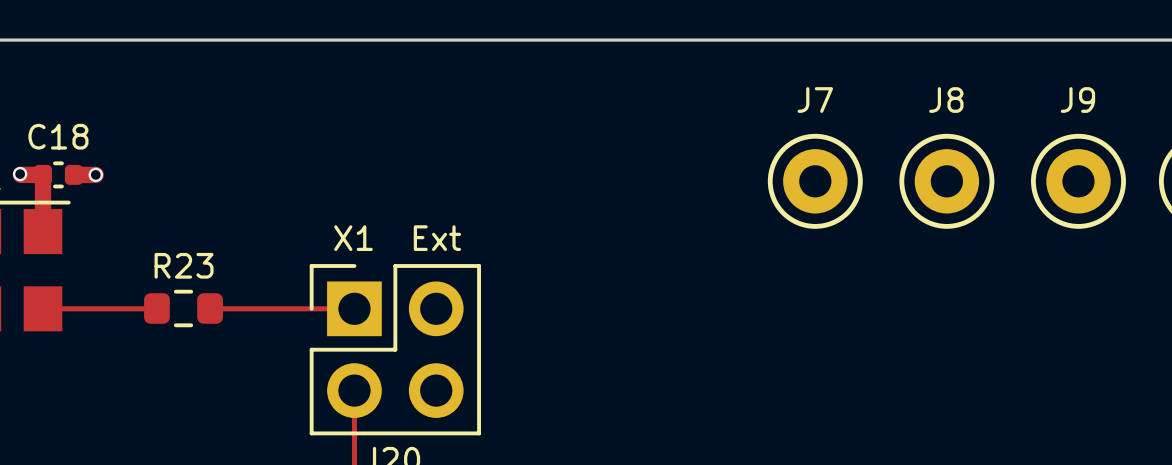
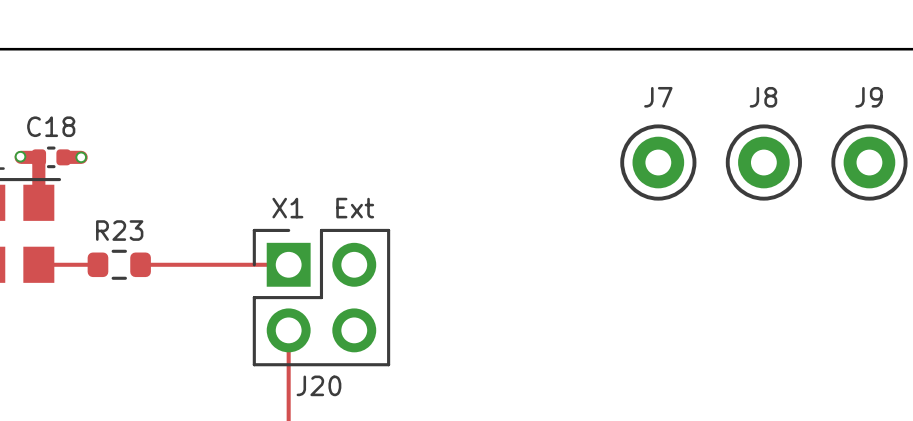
track: (116, 308) (156, 308) -> (140, 264) (173, 264)
R23 position: (183, 308) -> (119, 264)

